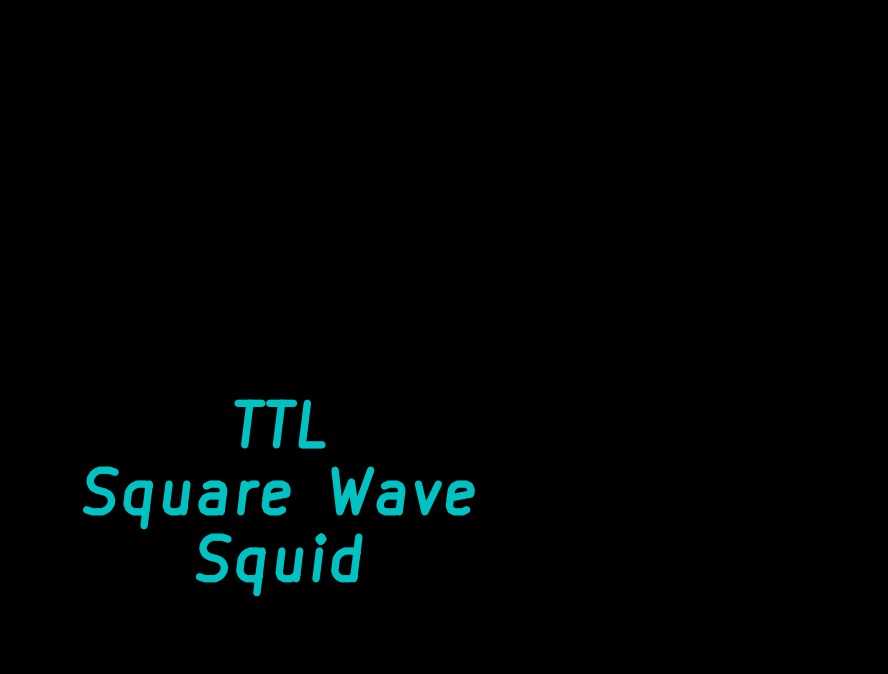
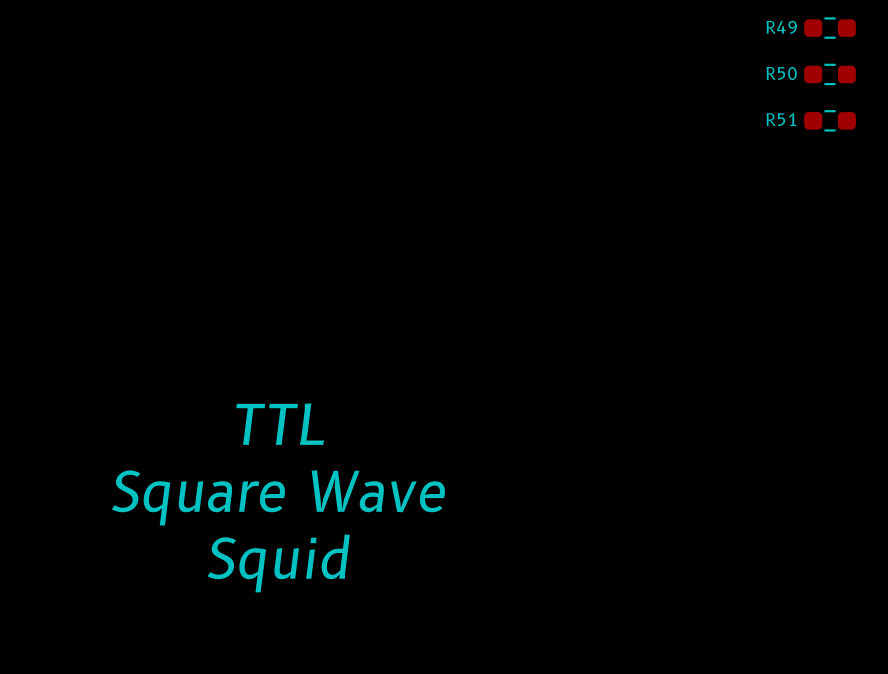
R49: none -> (830, 28)
R50: none -> (830, 74)
R51: none -> (830, 120)

